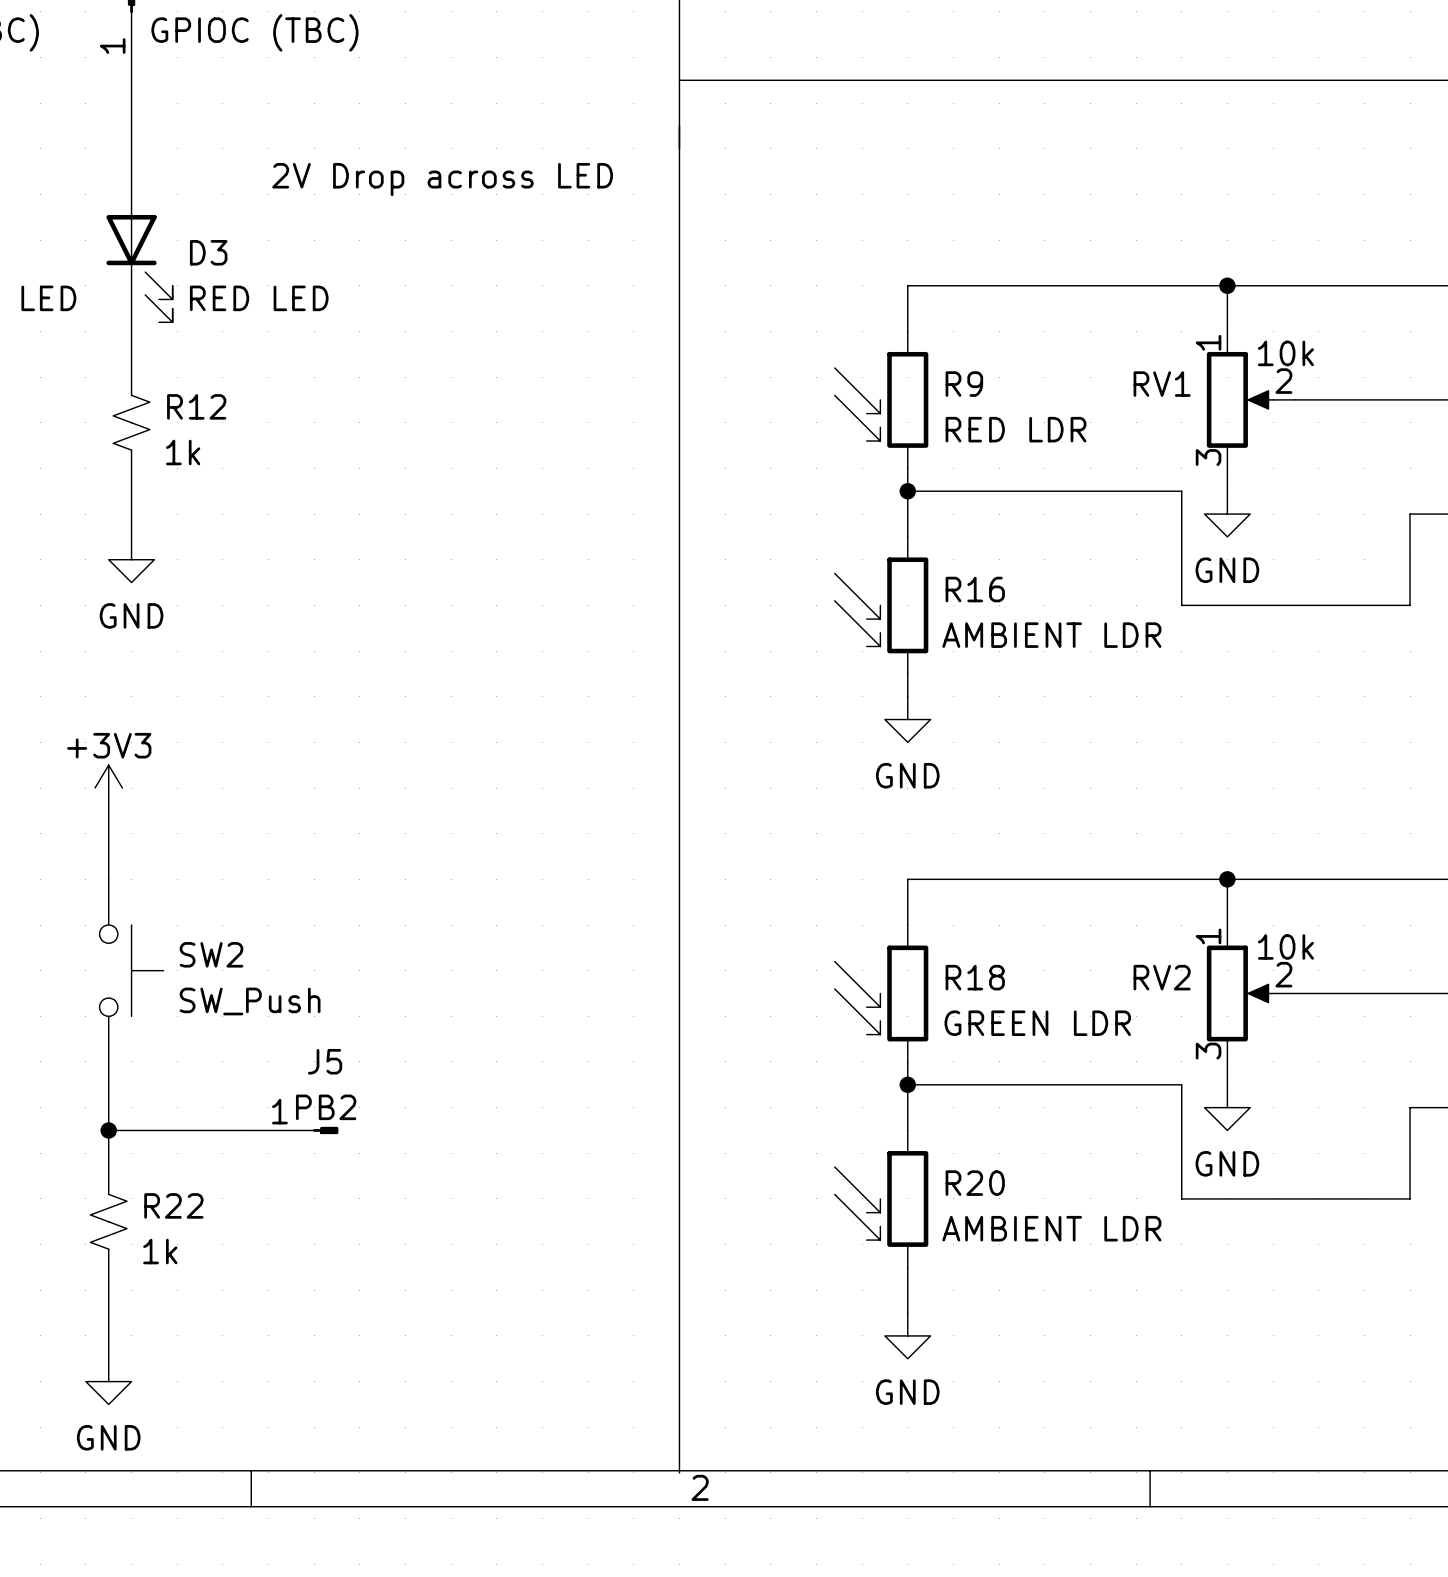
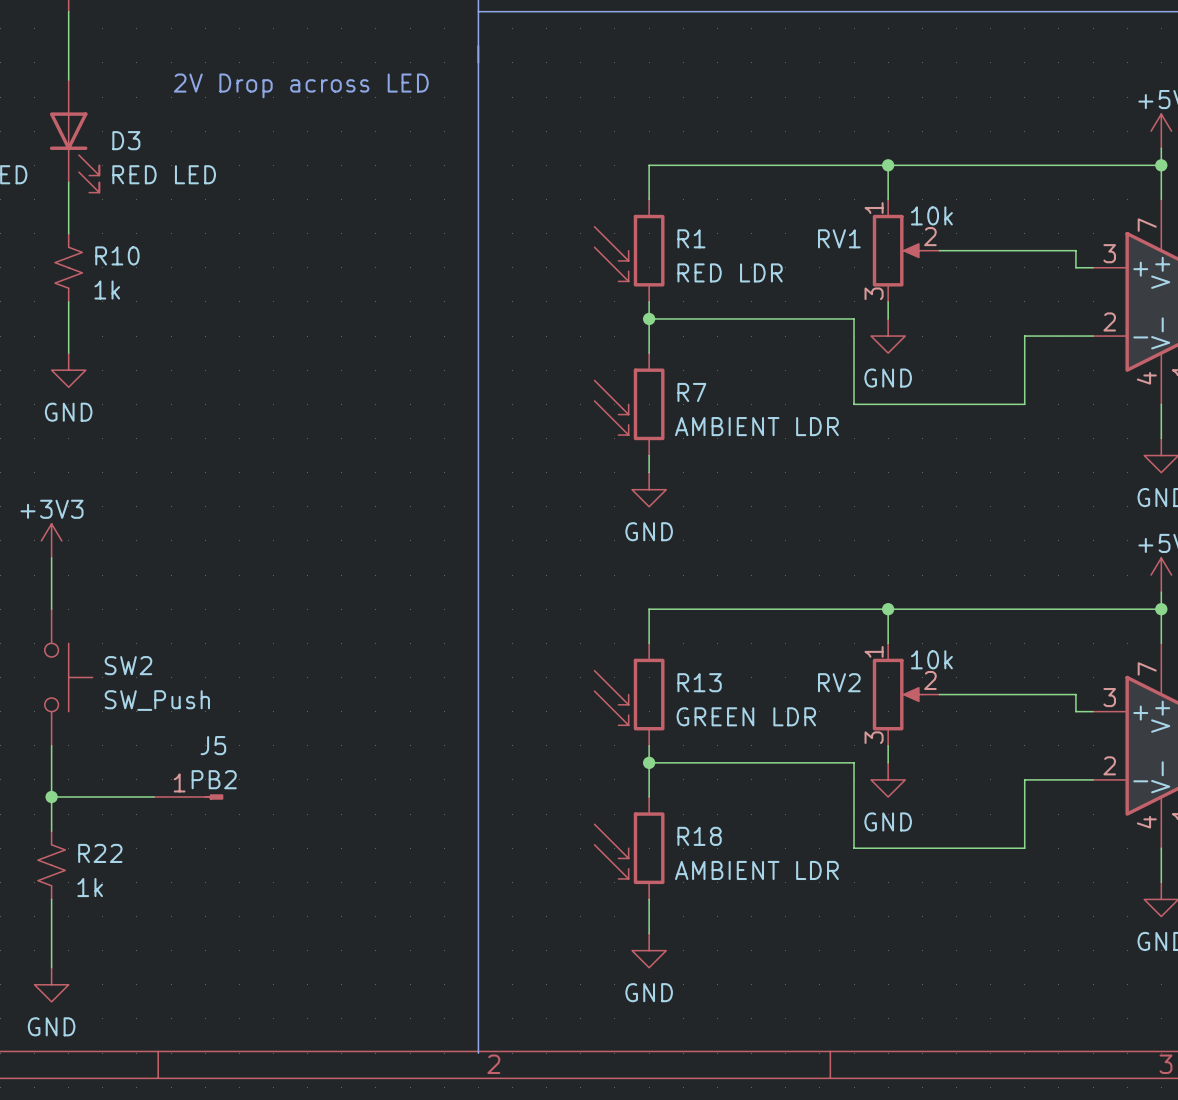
R9 name: R9 (964, 384) -> R1 (691, 238)
R12 name: R12 (196, 406) -> R10 (117, 255)
R16 name: R16 (975, 589) -> R7 (691, 392)
R18 name: R18 (975, 977) -> R13 (699, 682)
R20 name: R20 (975, 1183) -> R18 (699, 836)

